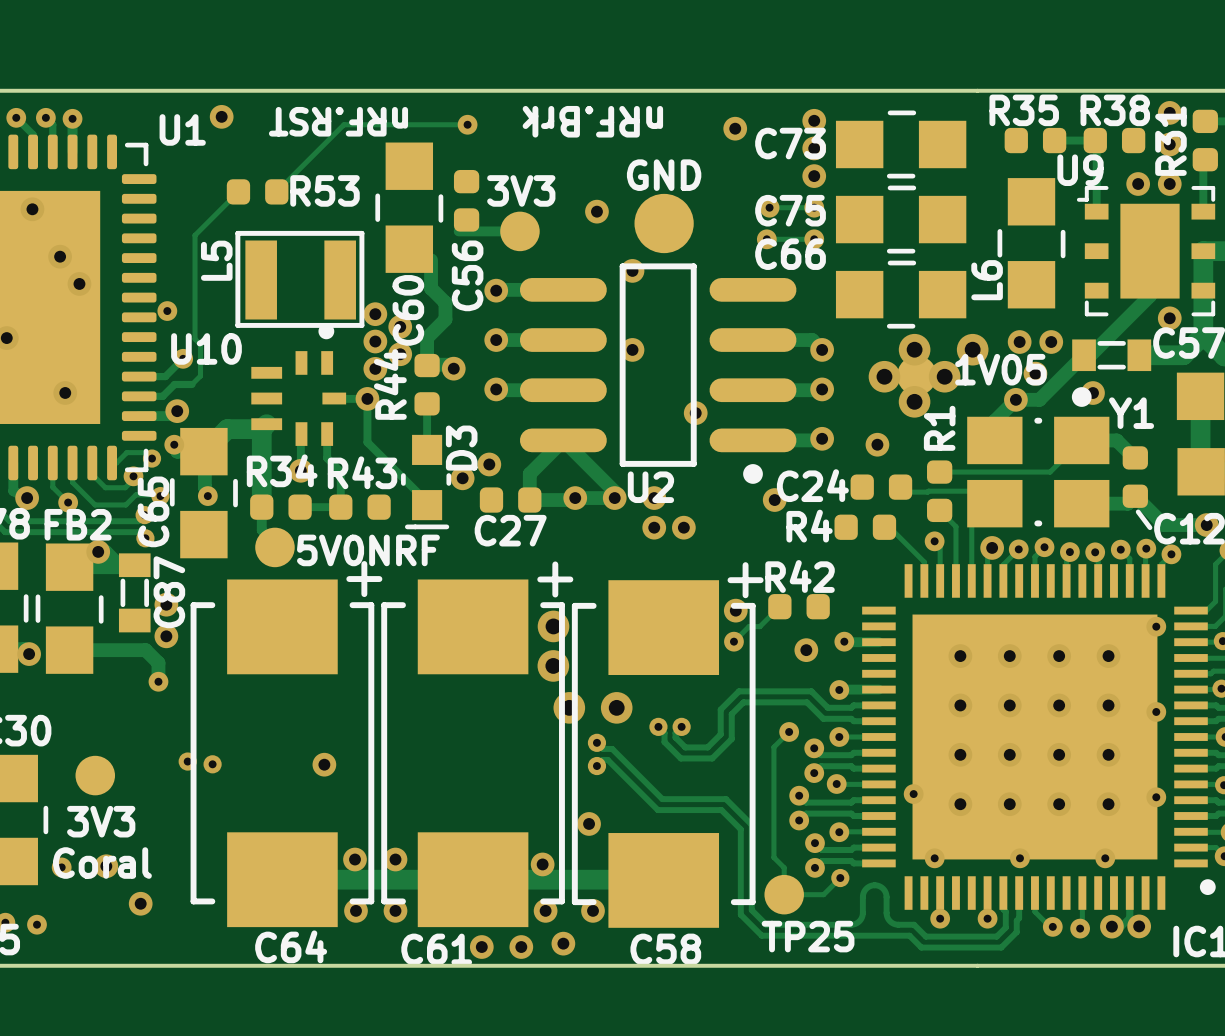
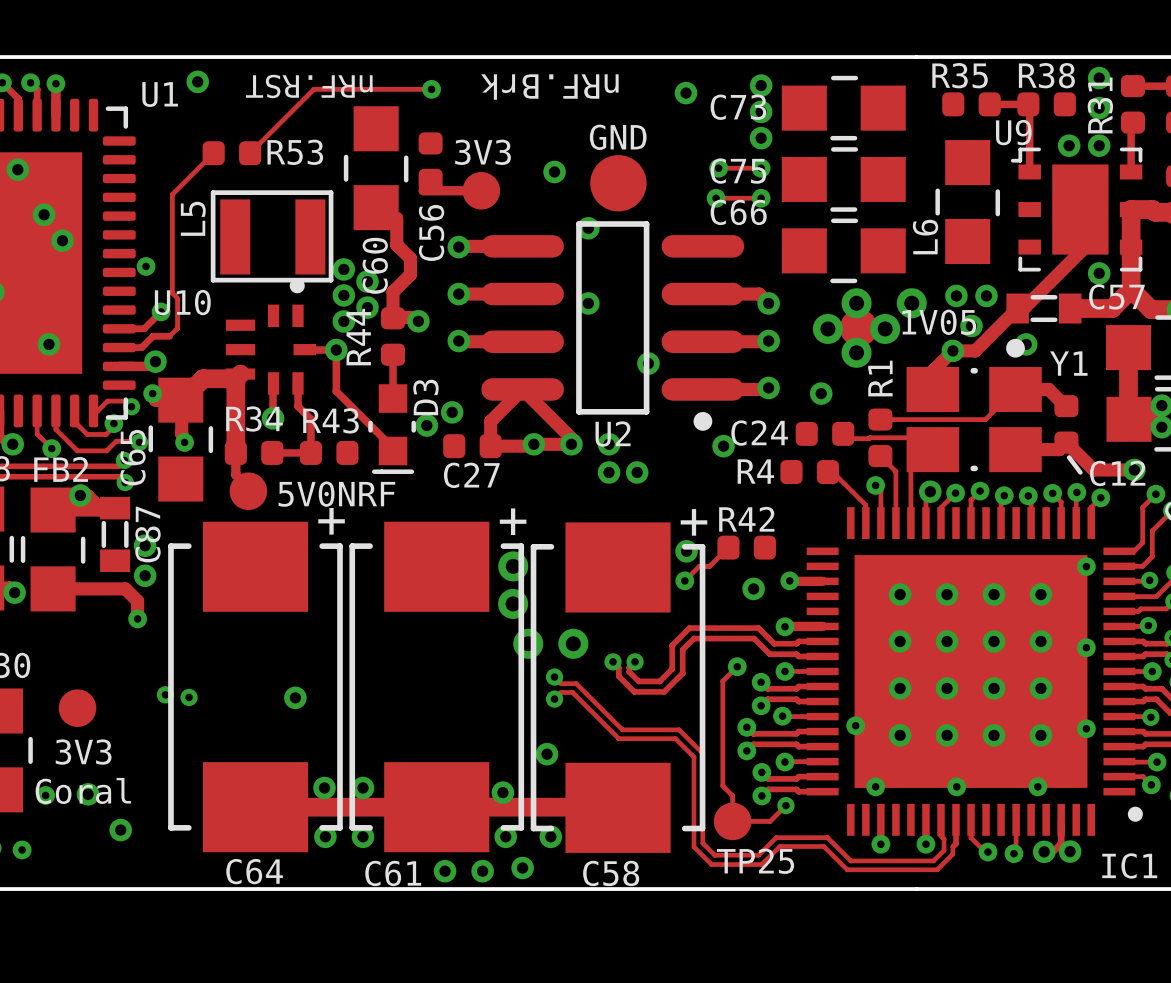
track: (603, 748) (612, 748) (662, 799) (726, 799) (751, 824) (751, 910) (766, 924) (855, 923) (862, 915) (864, 891) (868, 886) (874, 885) (880, 886) (885, 892) (886, 914) (890, 921) (896, 924) (914, 924) (925, 936) (996, 936) (1005, 927) (1005, 911) (1003, 909) -> (560, 682) (576, 683) (622, 729) (679, 729) (702, 753) (702, 843) (714, 855) (758, 855) (776, 837) (827, 837) (850, 860) (933, 860) (944, 850) (944, 839) (940, 836)
track: (603, 759) (607, 759) (657, 810) (721, 810) (740, 829) (740, 914) (761, 935) (909, 935) (921, 947) (1001, 947) (1016, 932) (1016, 920) -> (560, 693) (572, 692) (618, 738) (675, 738) (693, 757) (693, 846) (711, 864) (761, 864) (779, 846) (823, 846) (847, 869) (937, 869) (952, 854) (953, 846)

